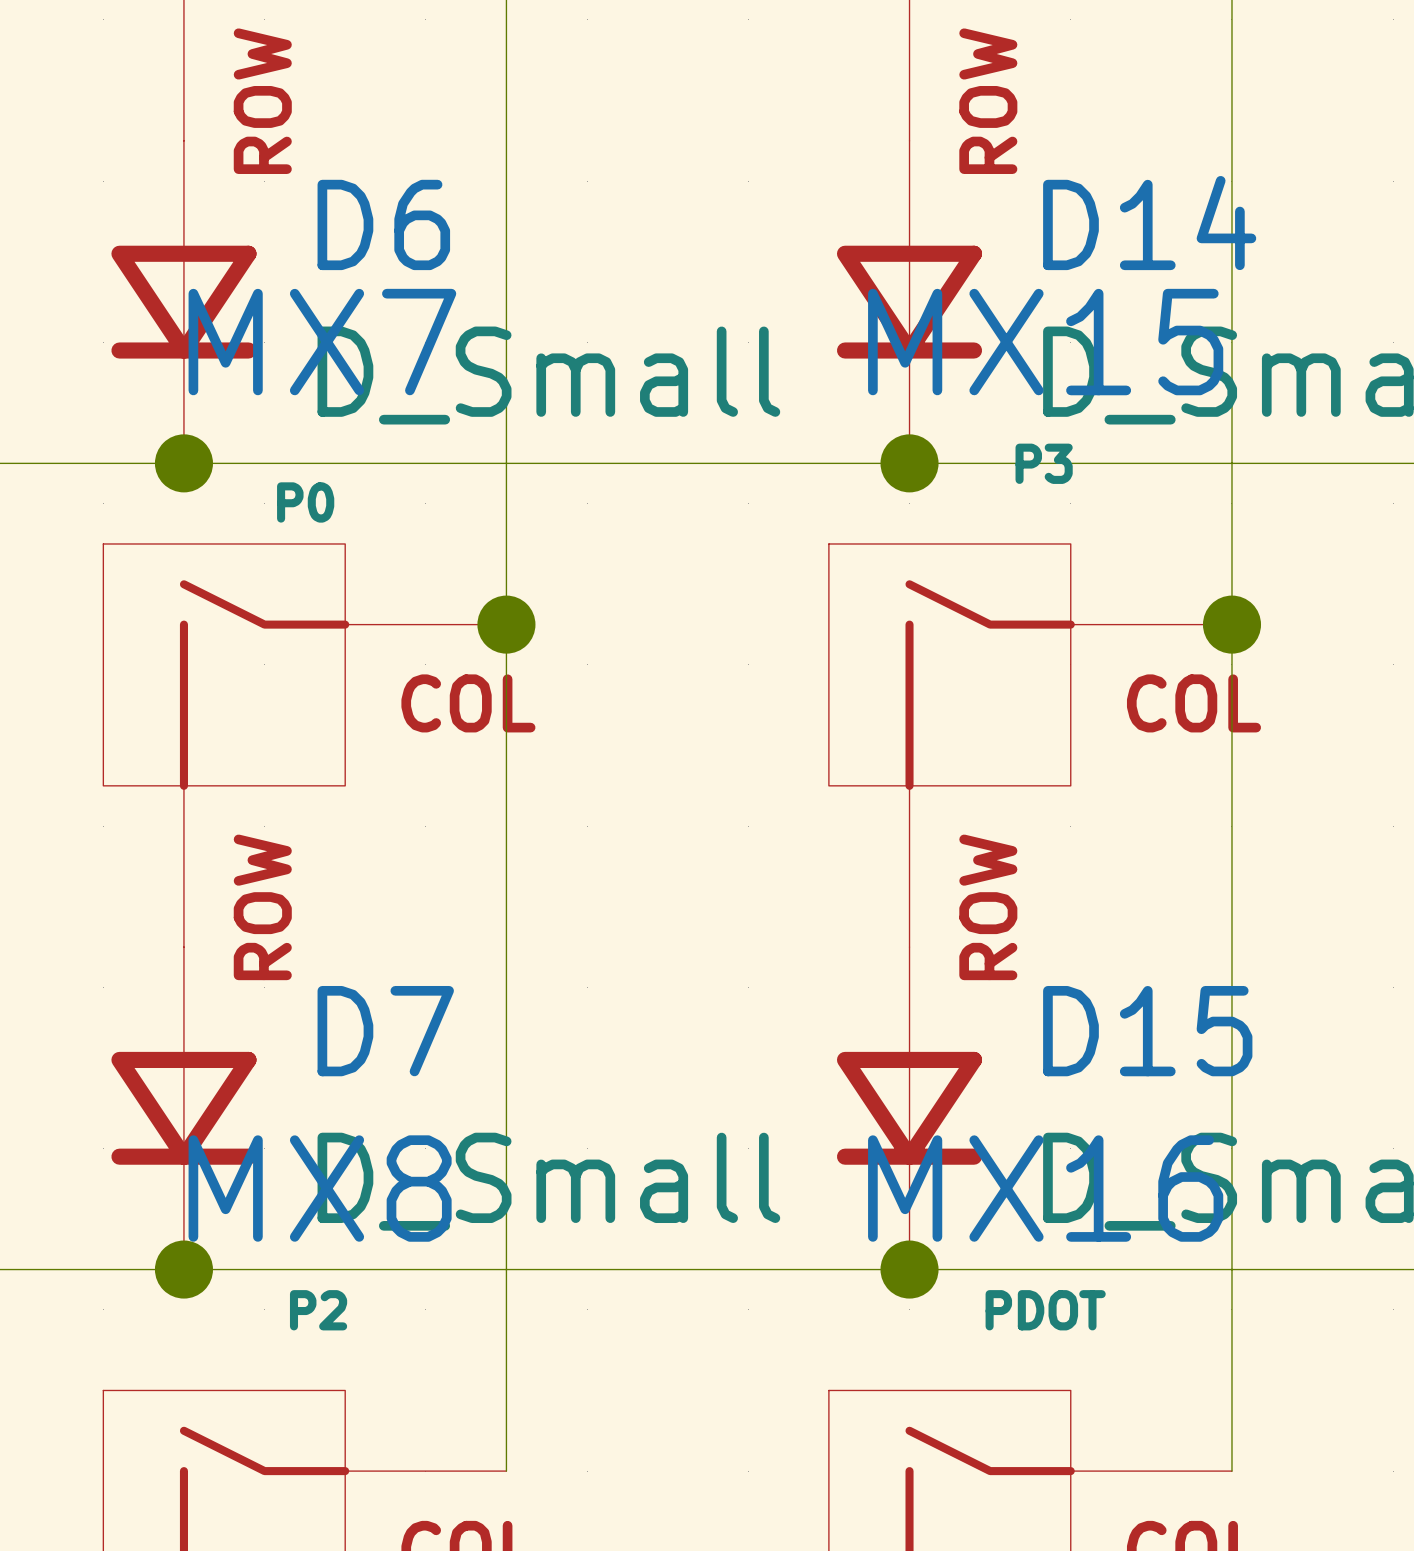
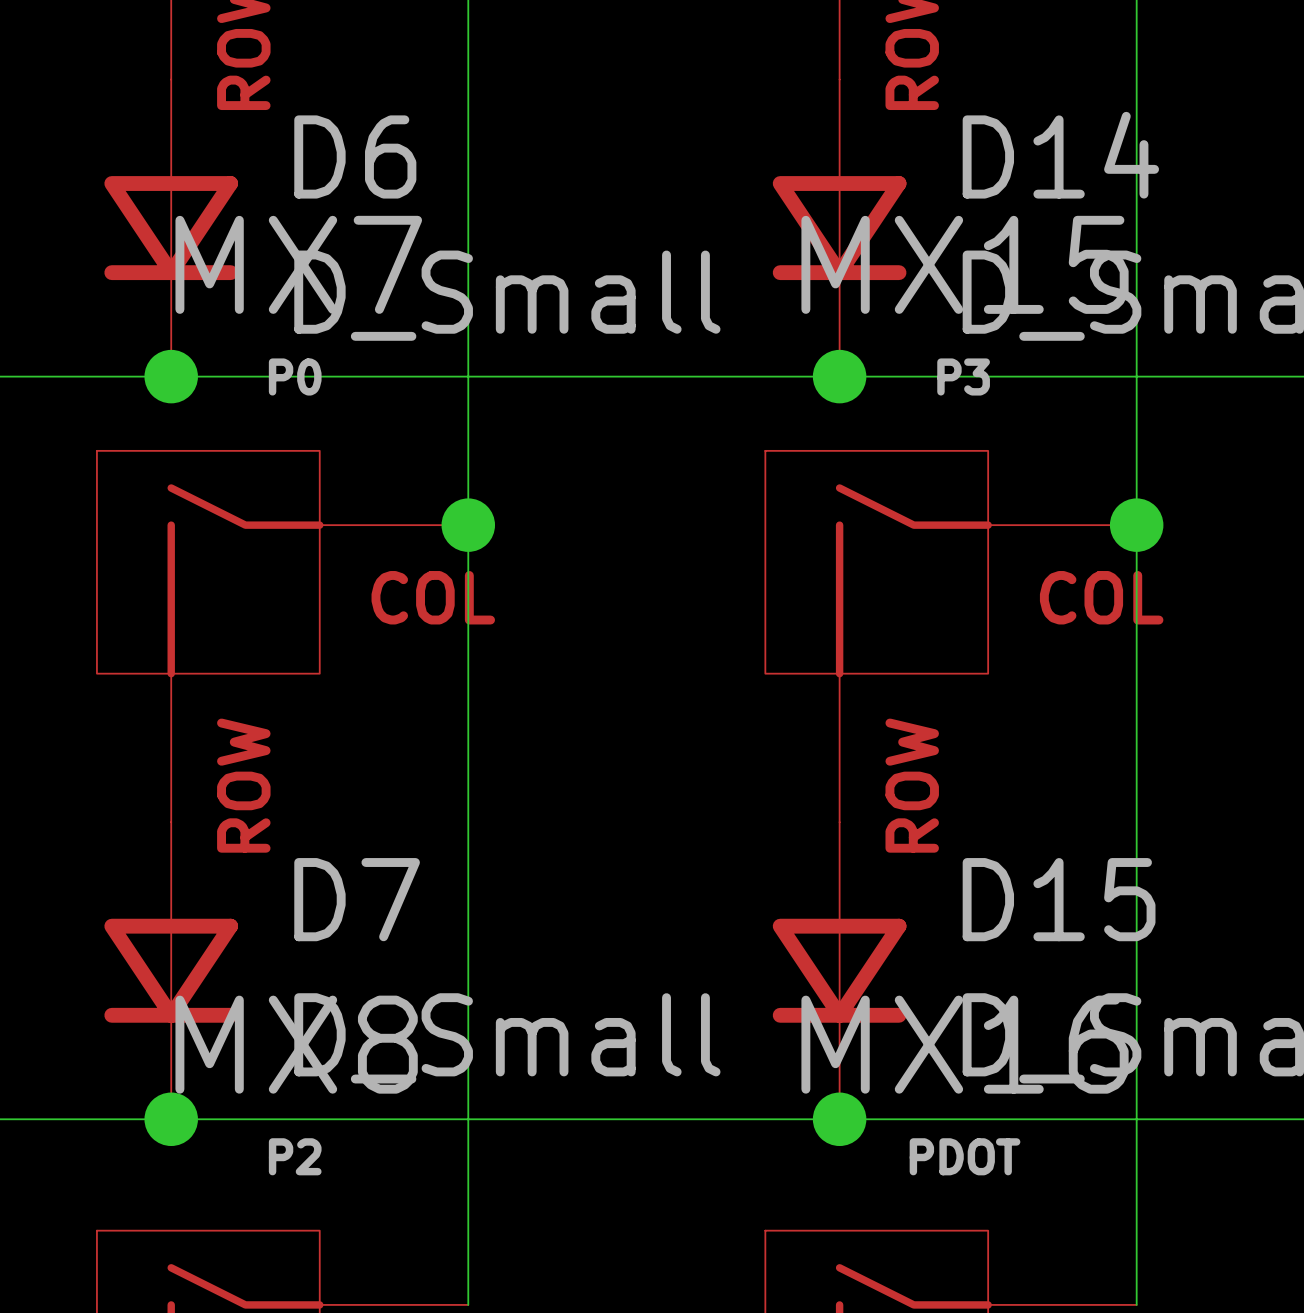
MX7 value position: P0 (305, 502) -> P0 (295, 376)

